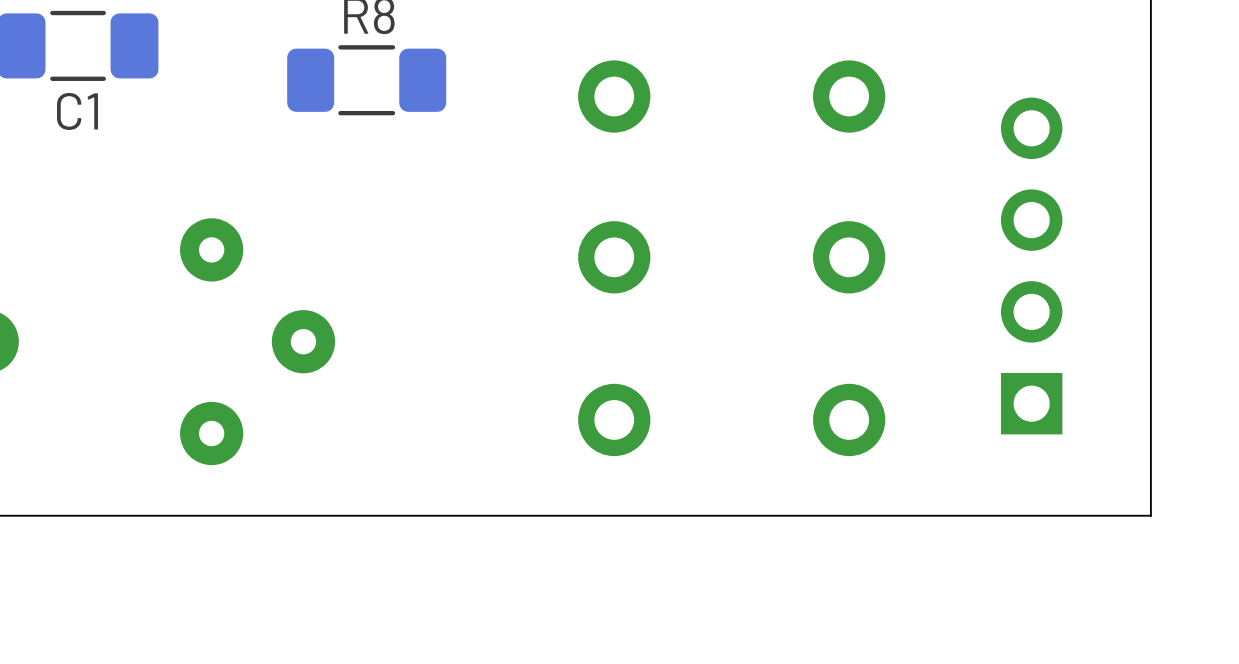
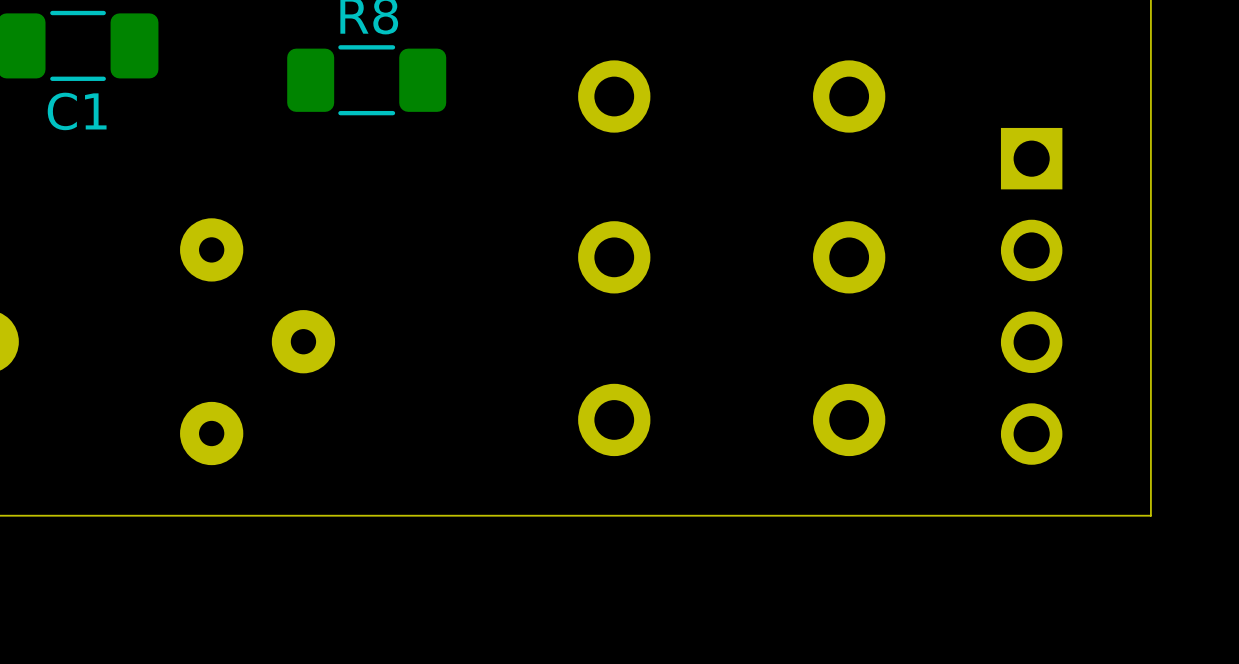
part rotation: 0° (1031, 266) -> 180° (1031, 296)

